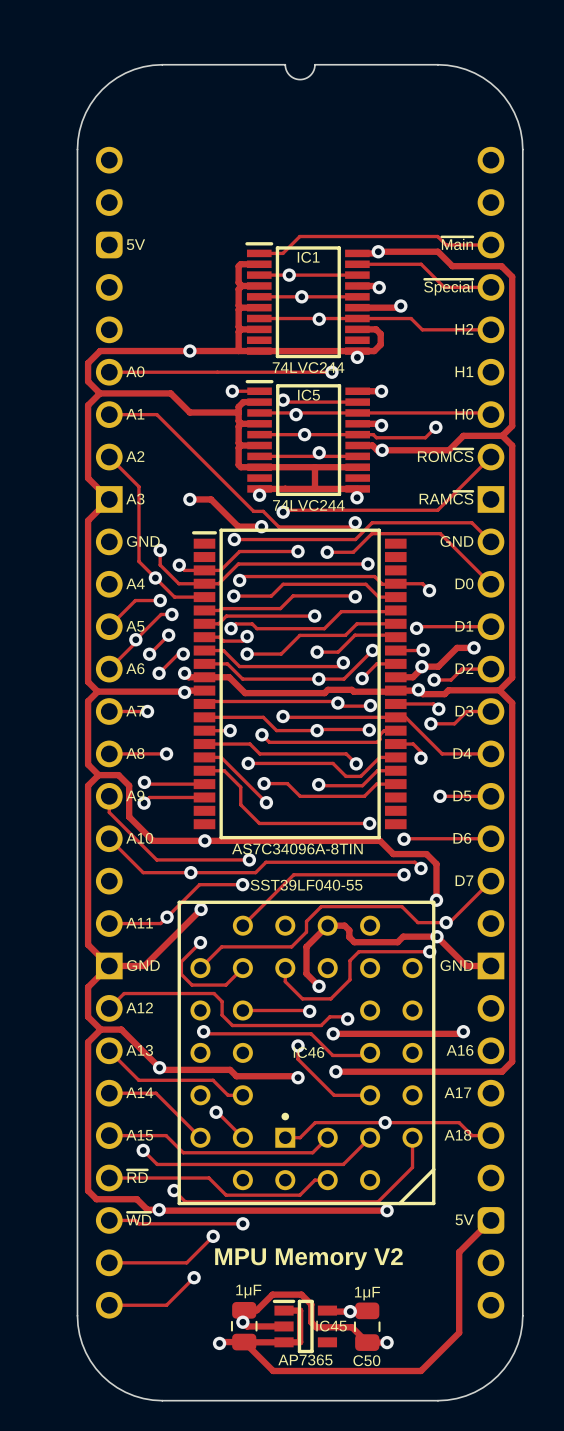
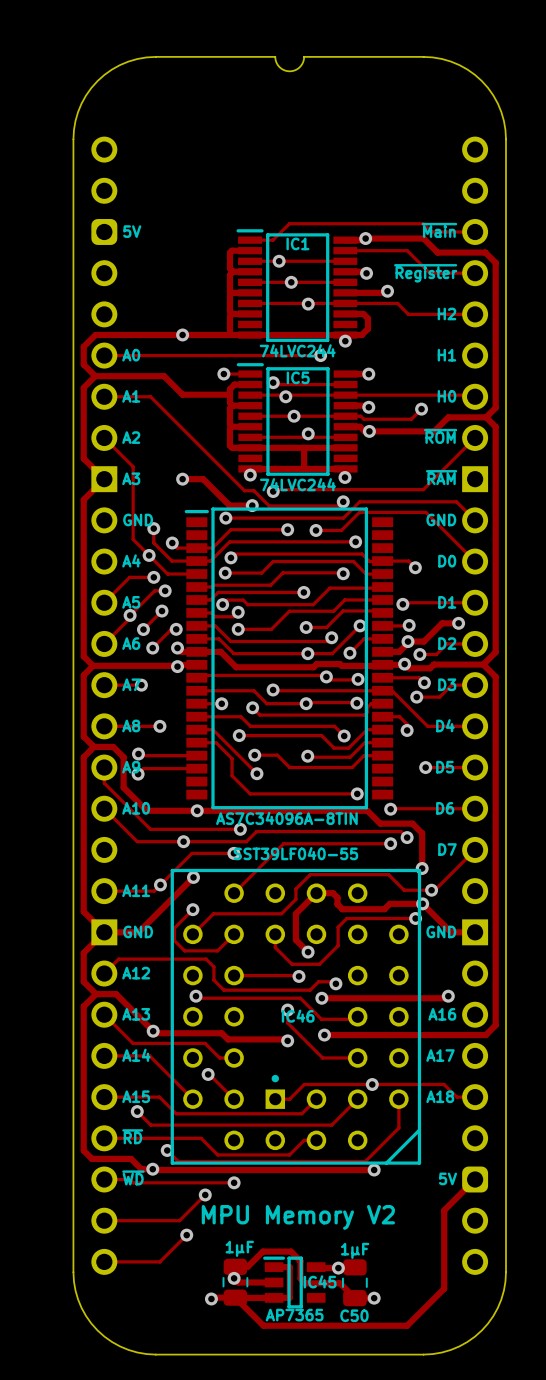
text: ~{Special} (448, 287) -> ~{Register} (425, 273)
text: ROM~{CS} (445, 455) -> ~{ROM} (440, 436)
text: RAM~{CS} (446, 497) -> ~{RAM} (441, 477)

